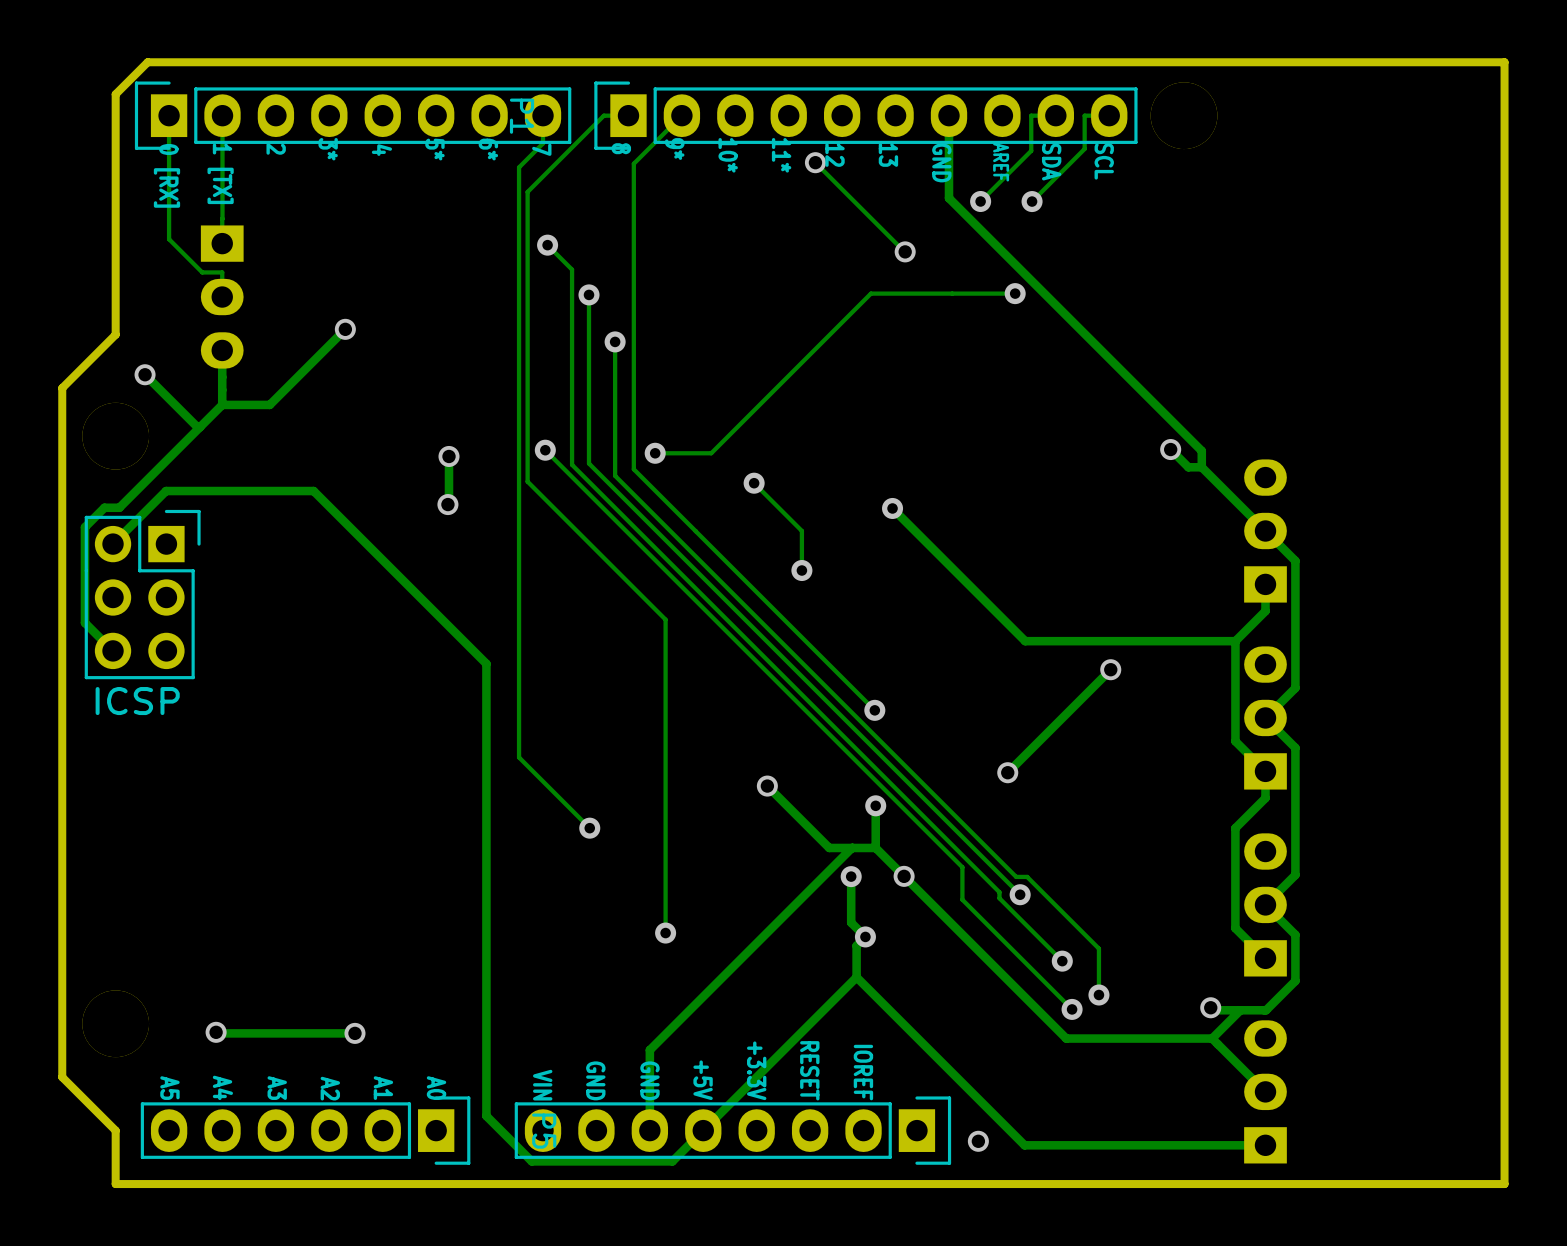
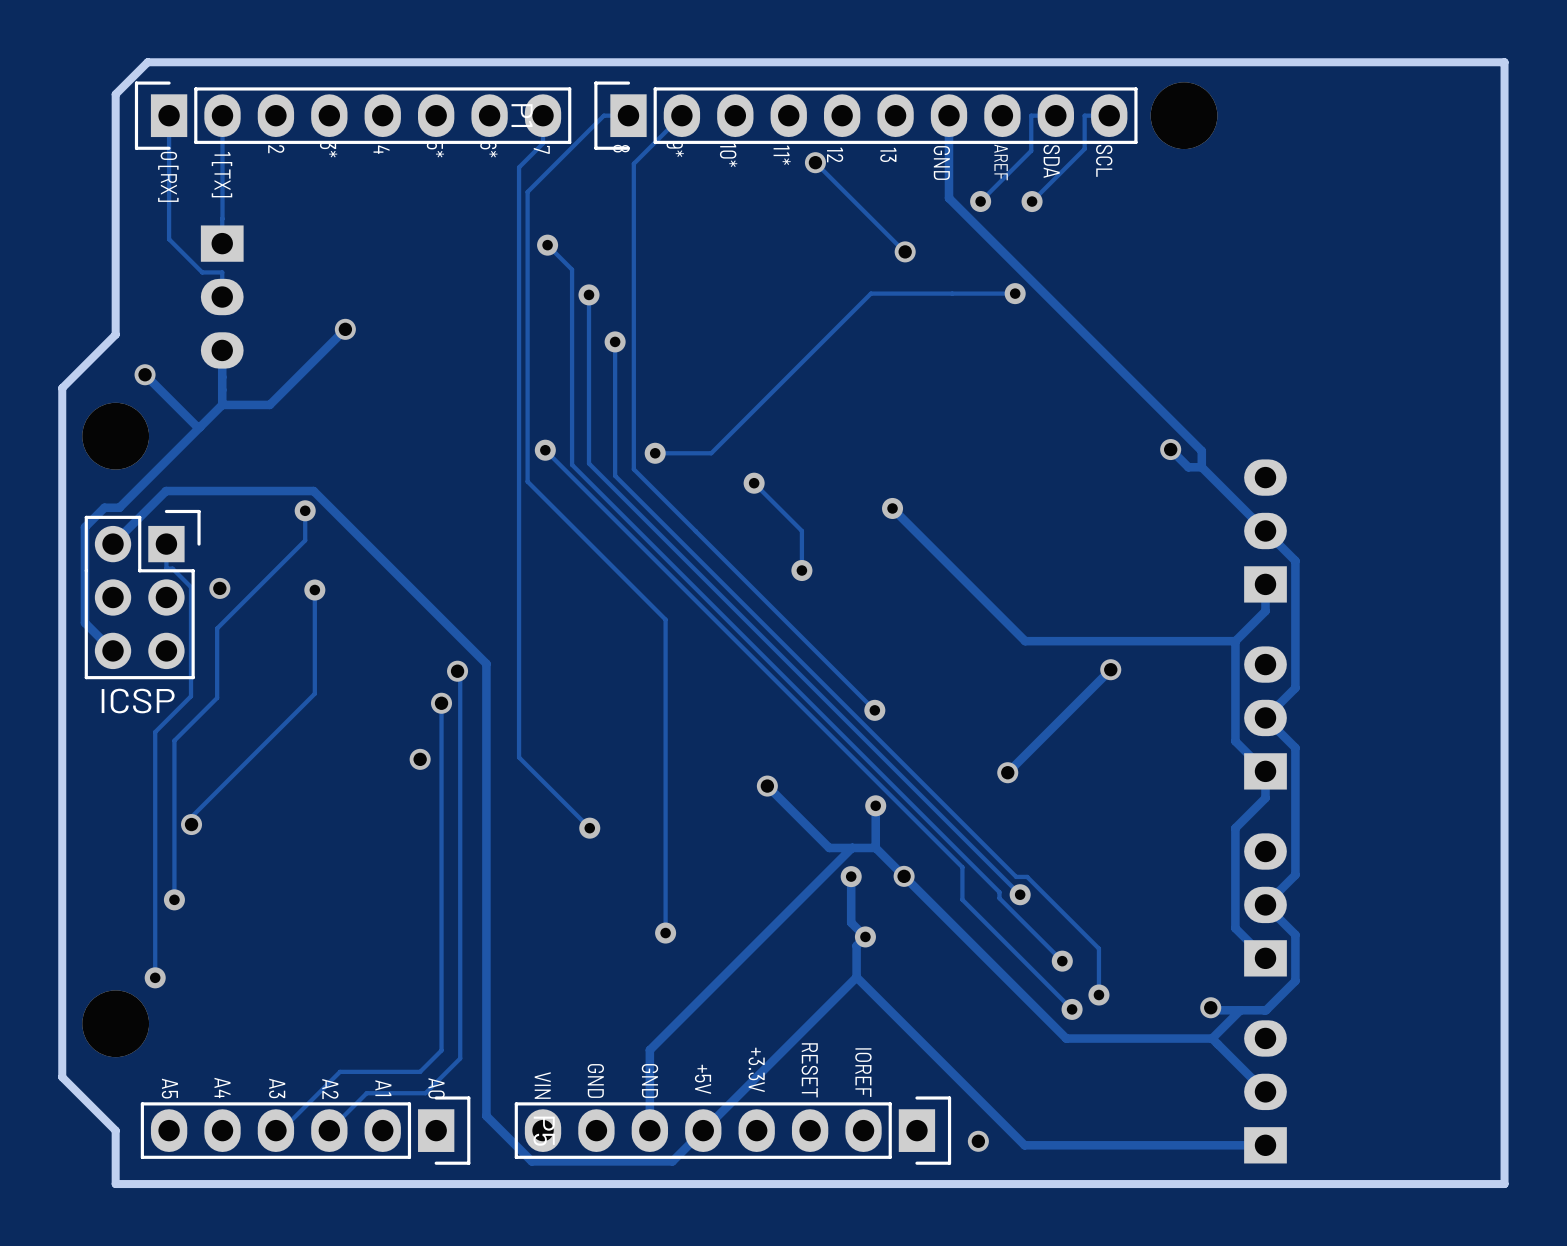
track: (449, 456) (447, 504) -> none
via: (449, 456) -> none
via: (447, 504) -> none
track: none -> (305, 510) (305, 540) (217, 628) (217, 697) (174, 740) (174, 899)
via: none -> (305, 510)
track: none -> (166, 544) (166, 568) (172, 568) (191, 587) (191, 696) (155, 732) (155, 977)
via: none -> (219, 588)
track: none -> (314, 590) (314, 693) (191, 817) (191, 824)
via: none -> (314, 590)
track: none -> (457, 671) (460, 673) (460, 1058) (425, 1093) (366, 1093) (329, 1130)
via: none -> (457, 671)
track: none -> (441, 703) (441, 1050) (420, 1071) (340, 1071) (281, 1130)
via: none -> (441, 703)
via: none -> (420, 759)
via: none -> (191, 824)
via: none -> (174, 899)
via: none -> (155, 977)
track: (216, 1032) (354, 1033) -> none
via: (216, 1032) -> none
via: (354, 1033) -> none

